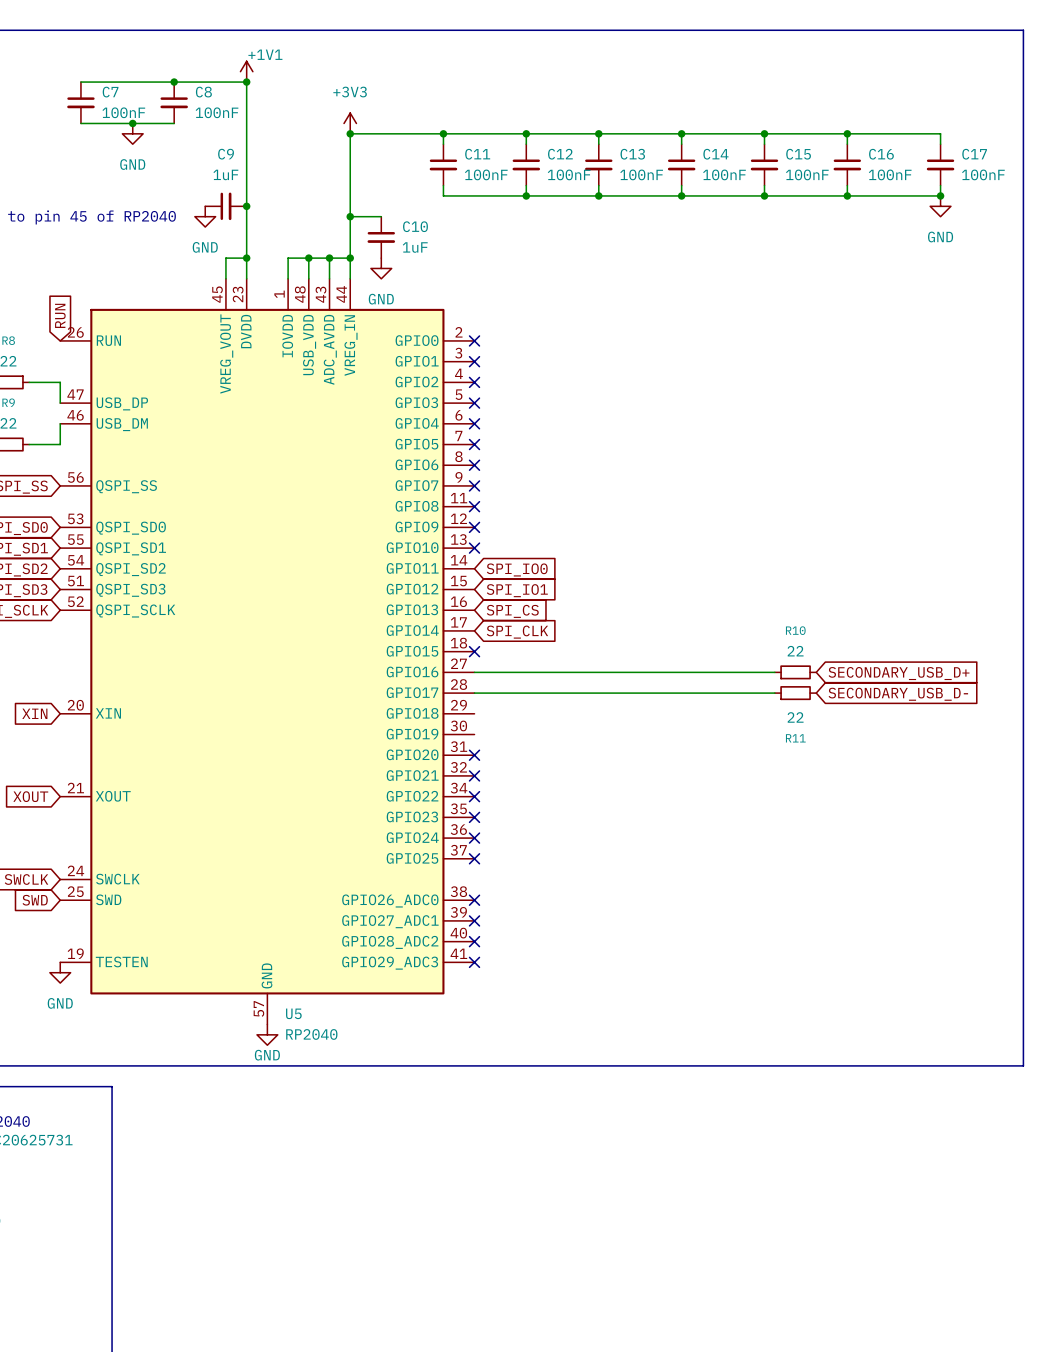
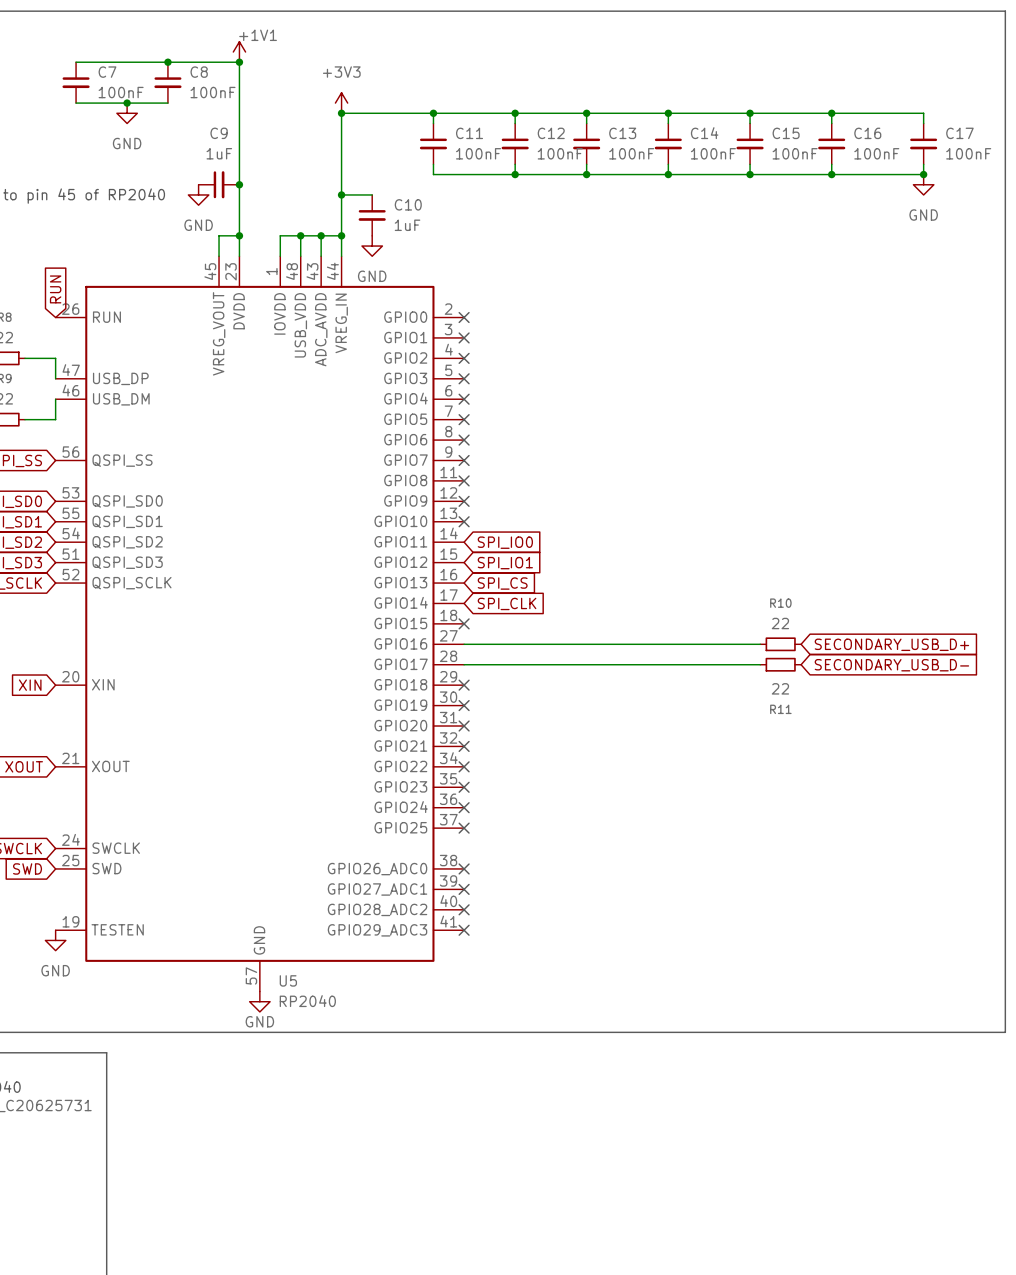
no-connect mark: none -> (464, 685)
no-connect mark: none -> (464, 705)

